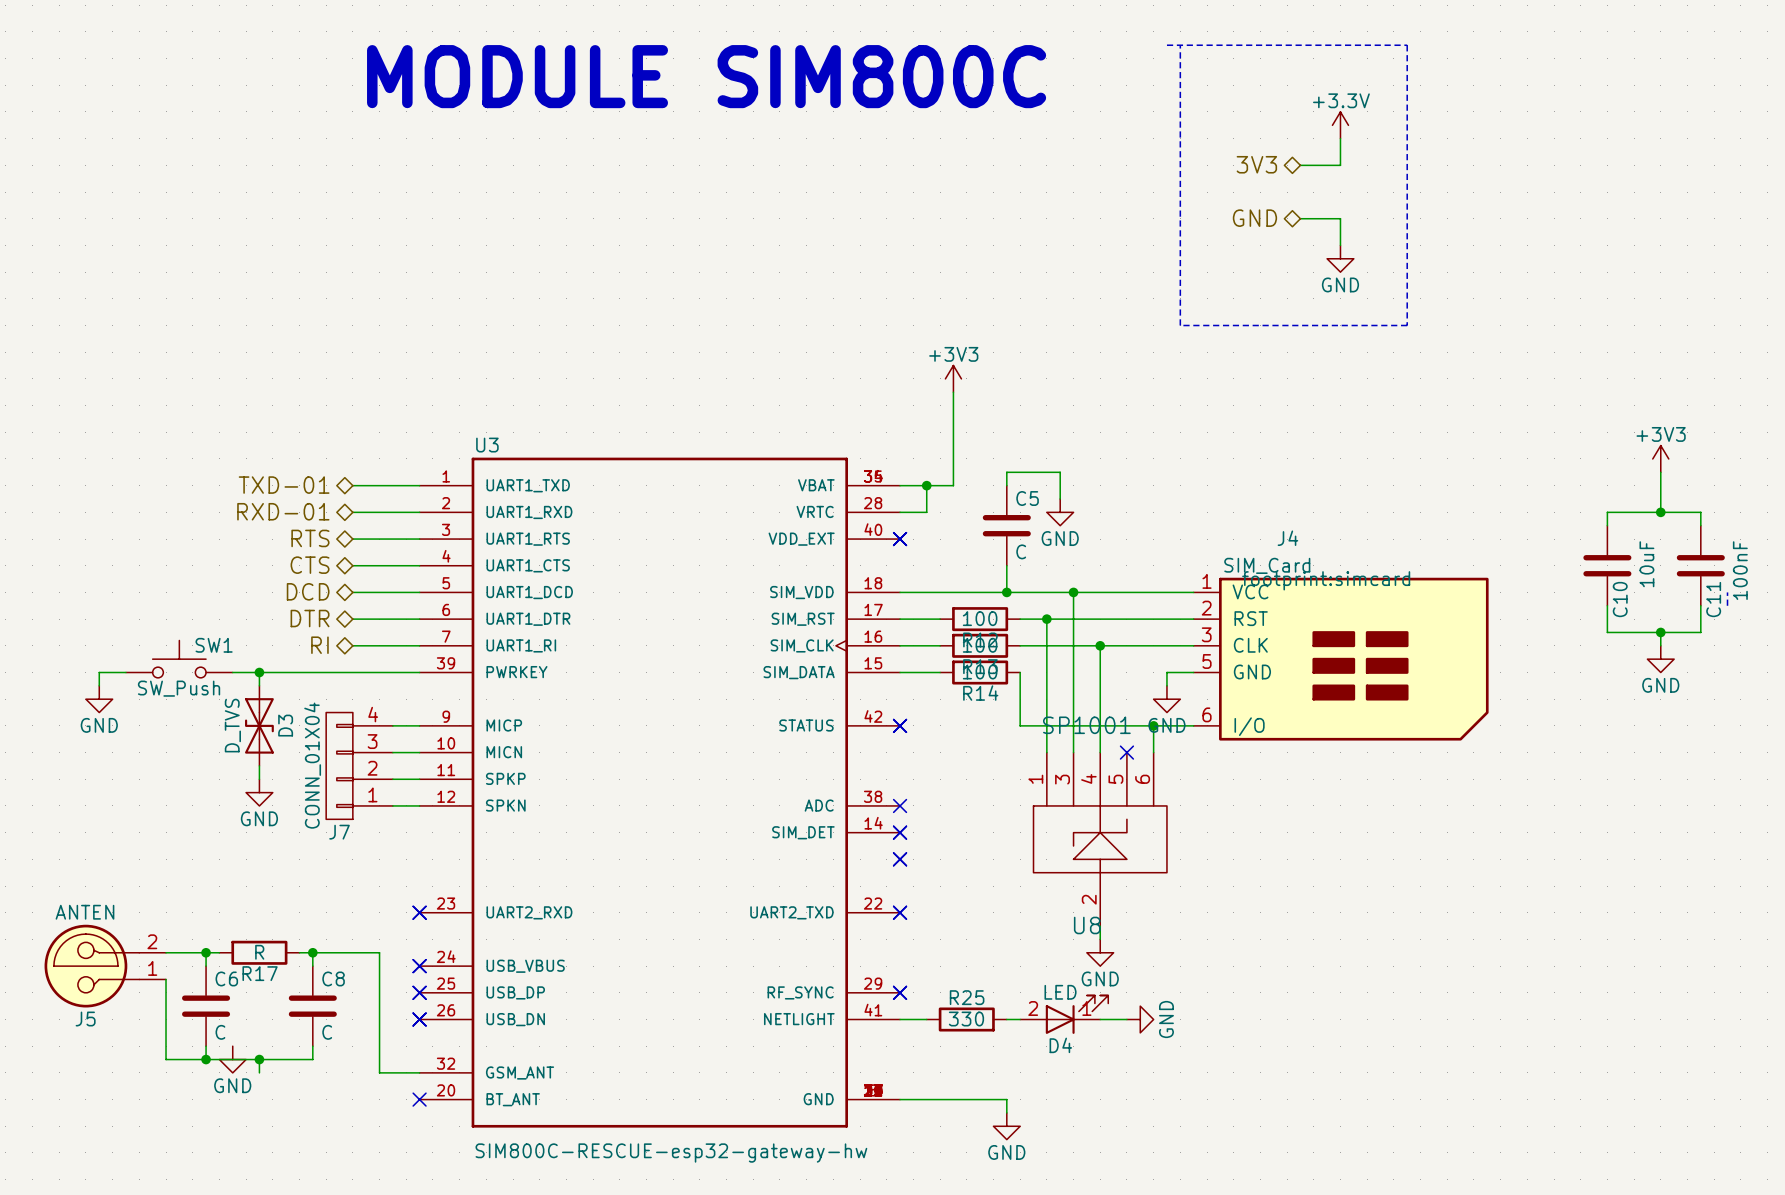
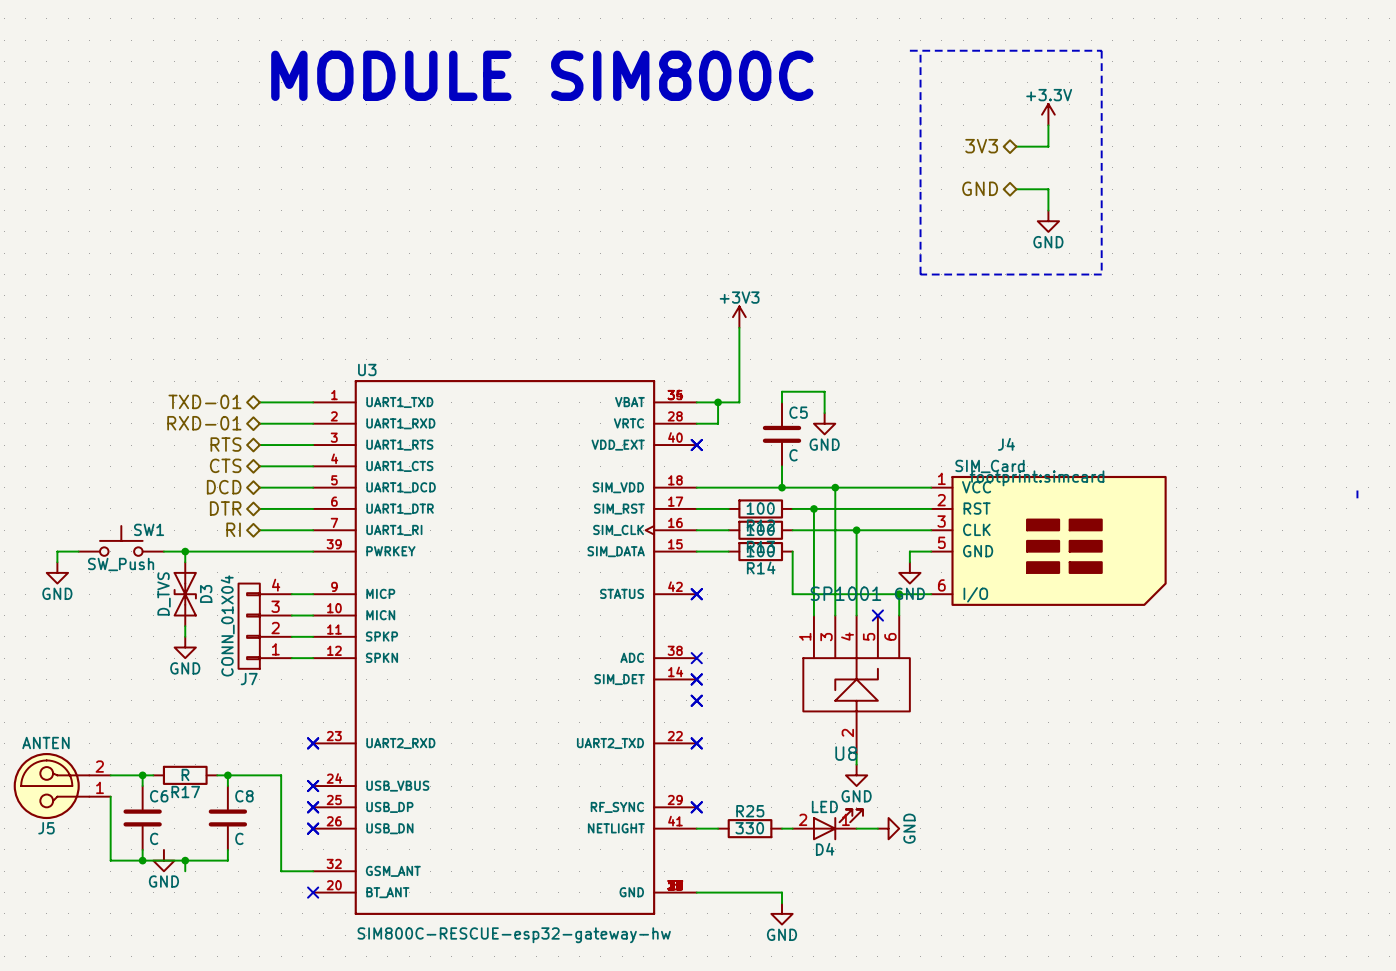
power symbol: +3V3 (1660, 458) -> none
wire: (1660, 472) (1660, 512) -> none
junction: (1660, 512) -> none
wire: (1607, 525) (1607, 512) (1700, 512) (1700, 525) -> none
C10: 10uF (1607, 565) -> none
C11: 100nF (1700, 565) -> none
wire: (1607, 605) (1607, 632) (1700, 632) (1700, 605) -> none
wire: (1660, 632) (1660, 645) -> none
junction: (1660, 632) -> none
power symbol: GND (1660, 659) -> none

